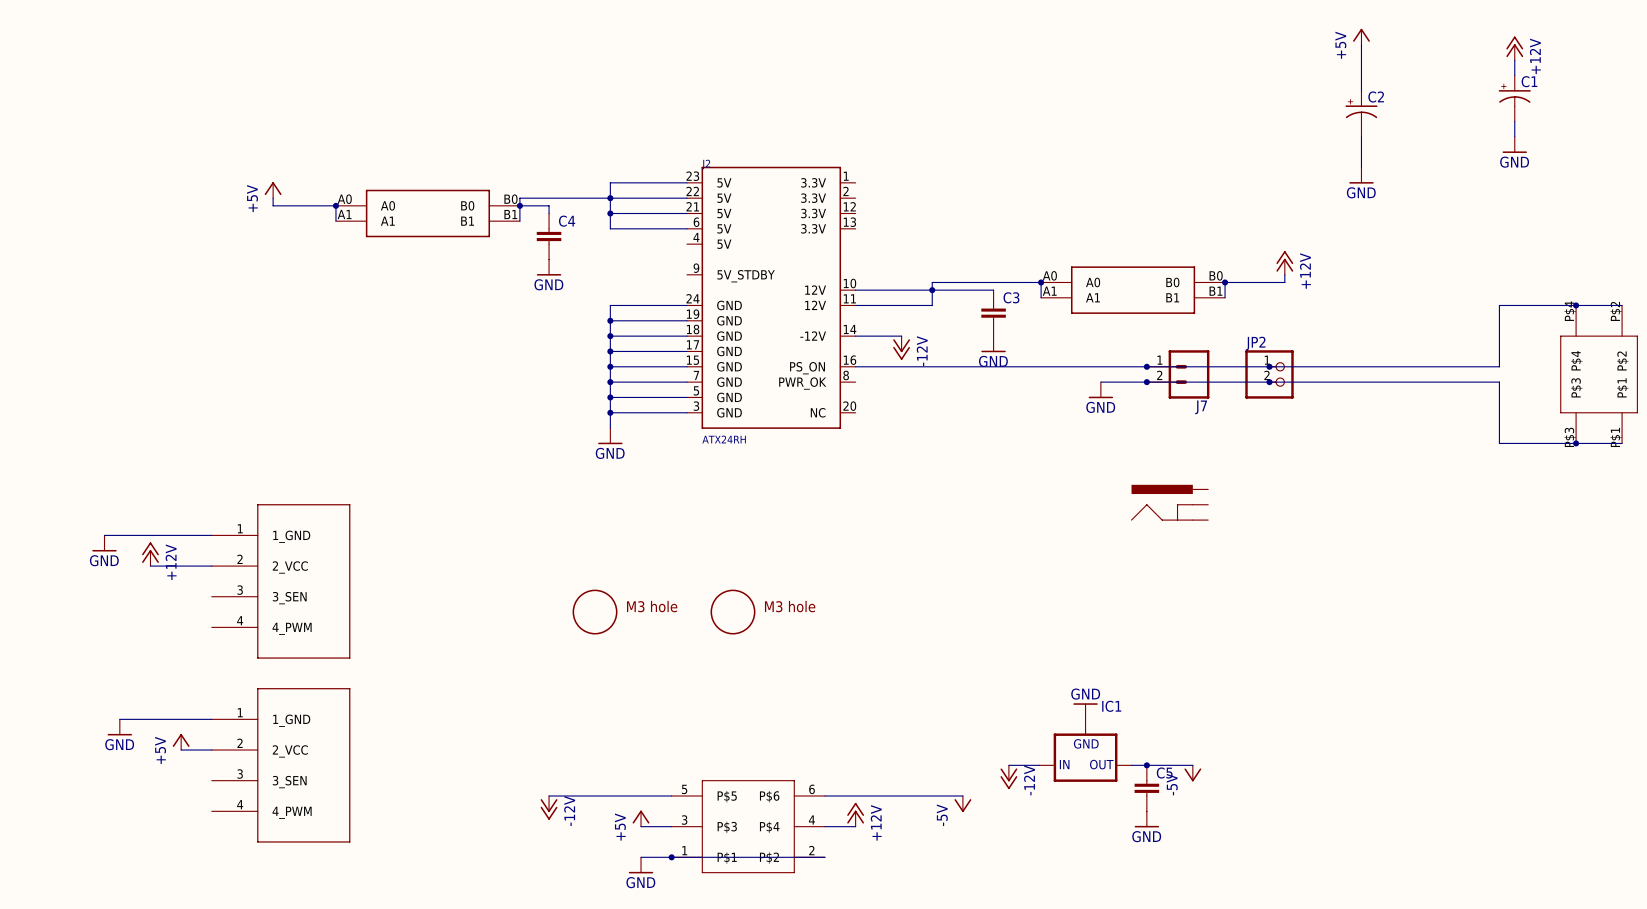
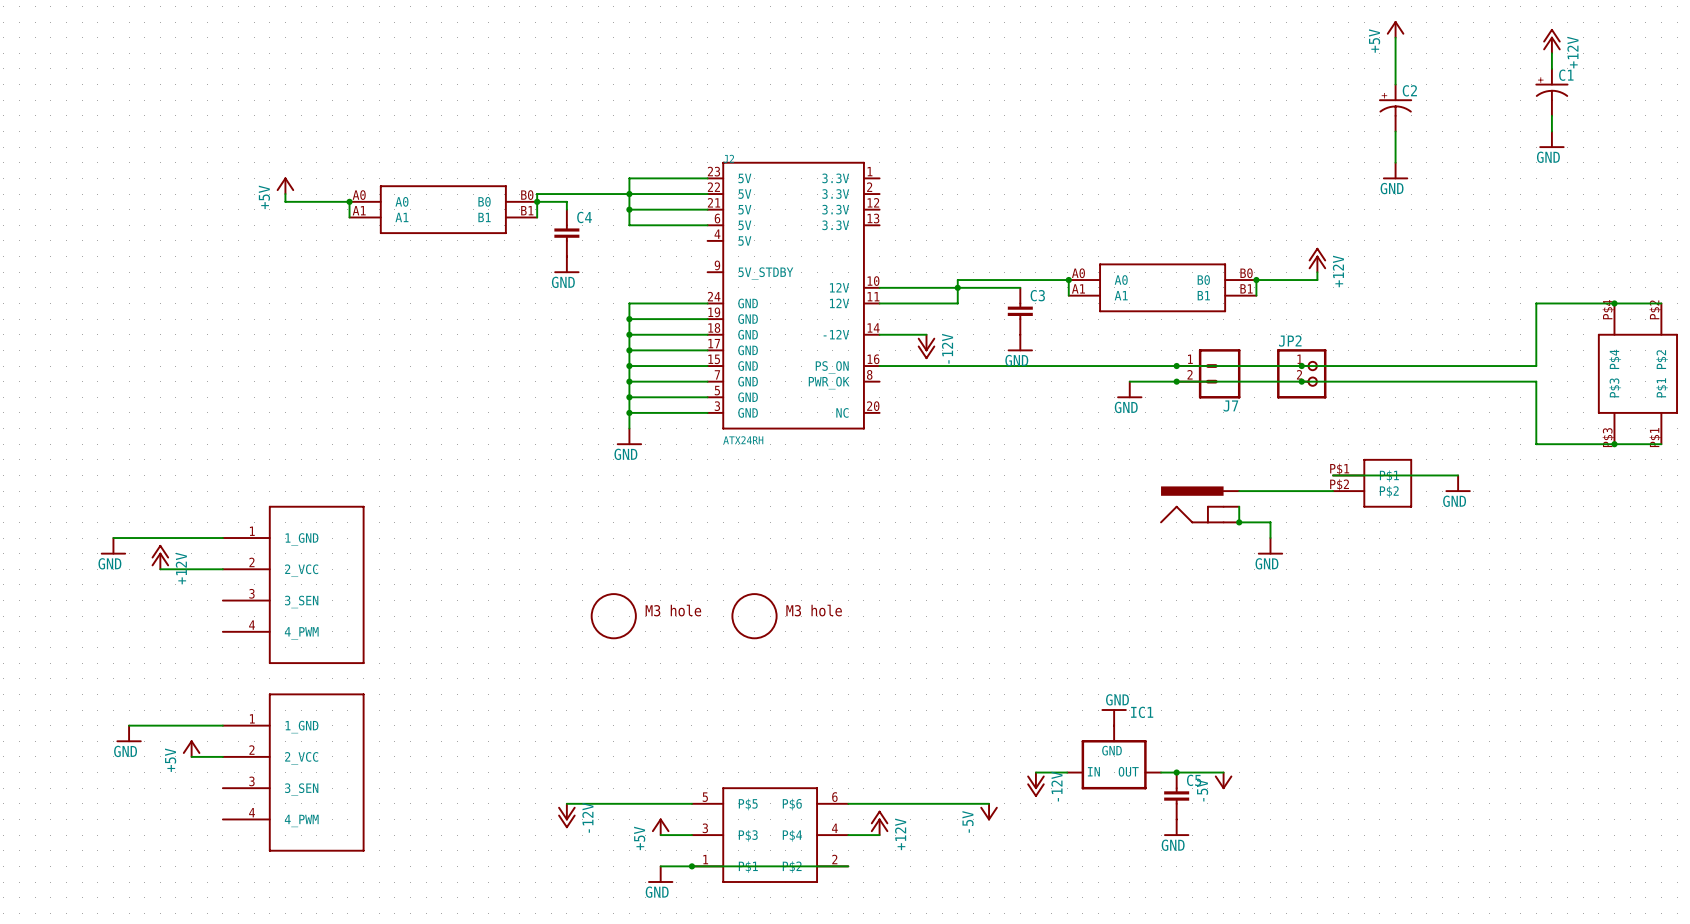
wire: none -> (1333, 475) (1458, 475)
part: none -> (1372, 483)
power symbol: none -> GND (1458, 483)
wire: none -> (1239, 491) (1333, 491)
wire: none -> (1239, 506) (1239, 522) (1270, 522) (1270, 538)
junction: none -> (1239, 522)
power symbol: none -> GND (1270, 546)

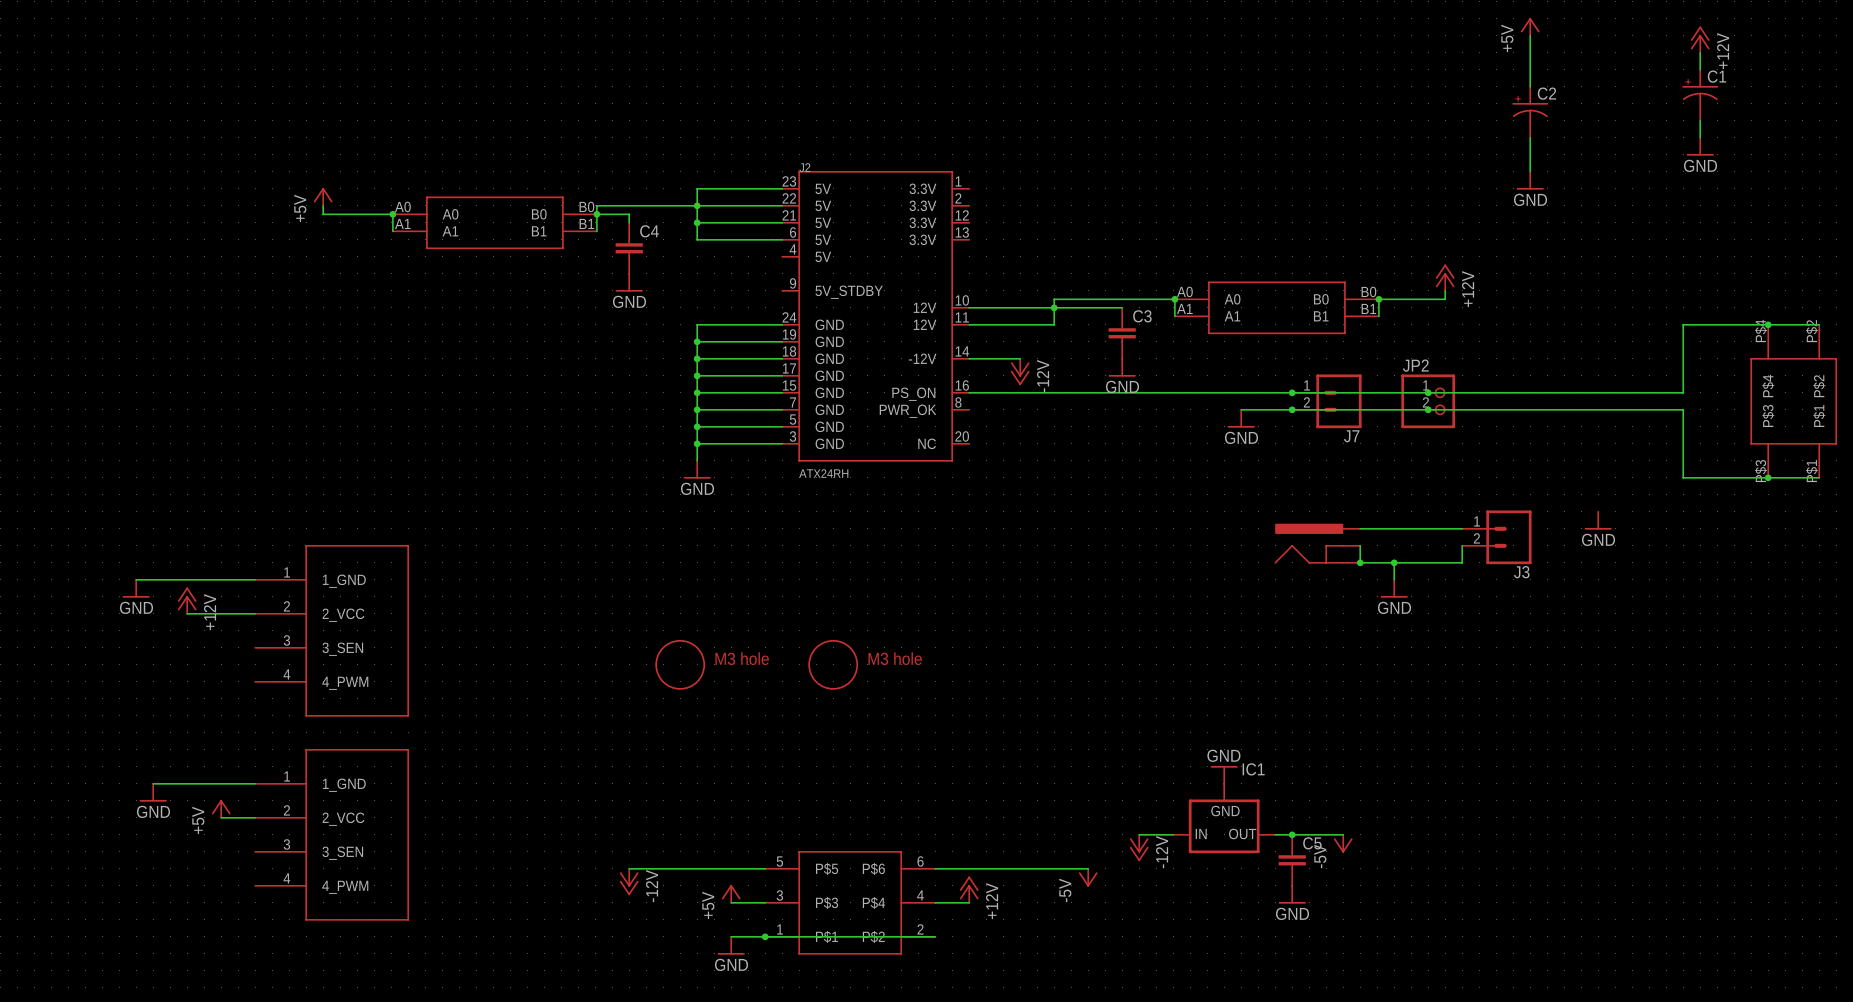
wire: (1333, 475) (1458, 475) -> none
part: (1372, 483) -> none
J3: none -> (1496, 537)
wire: none -> (1462, 545) (1462, 562) (1394, 562)
junction: none -> (1394, 562)

